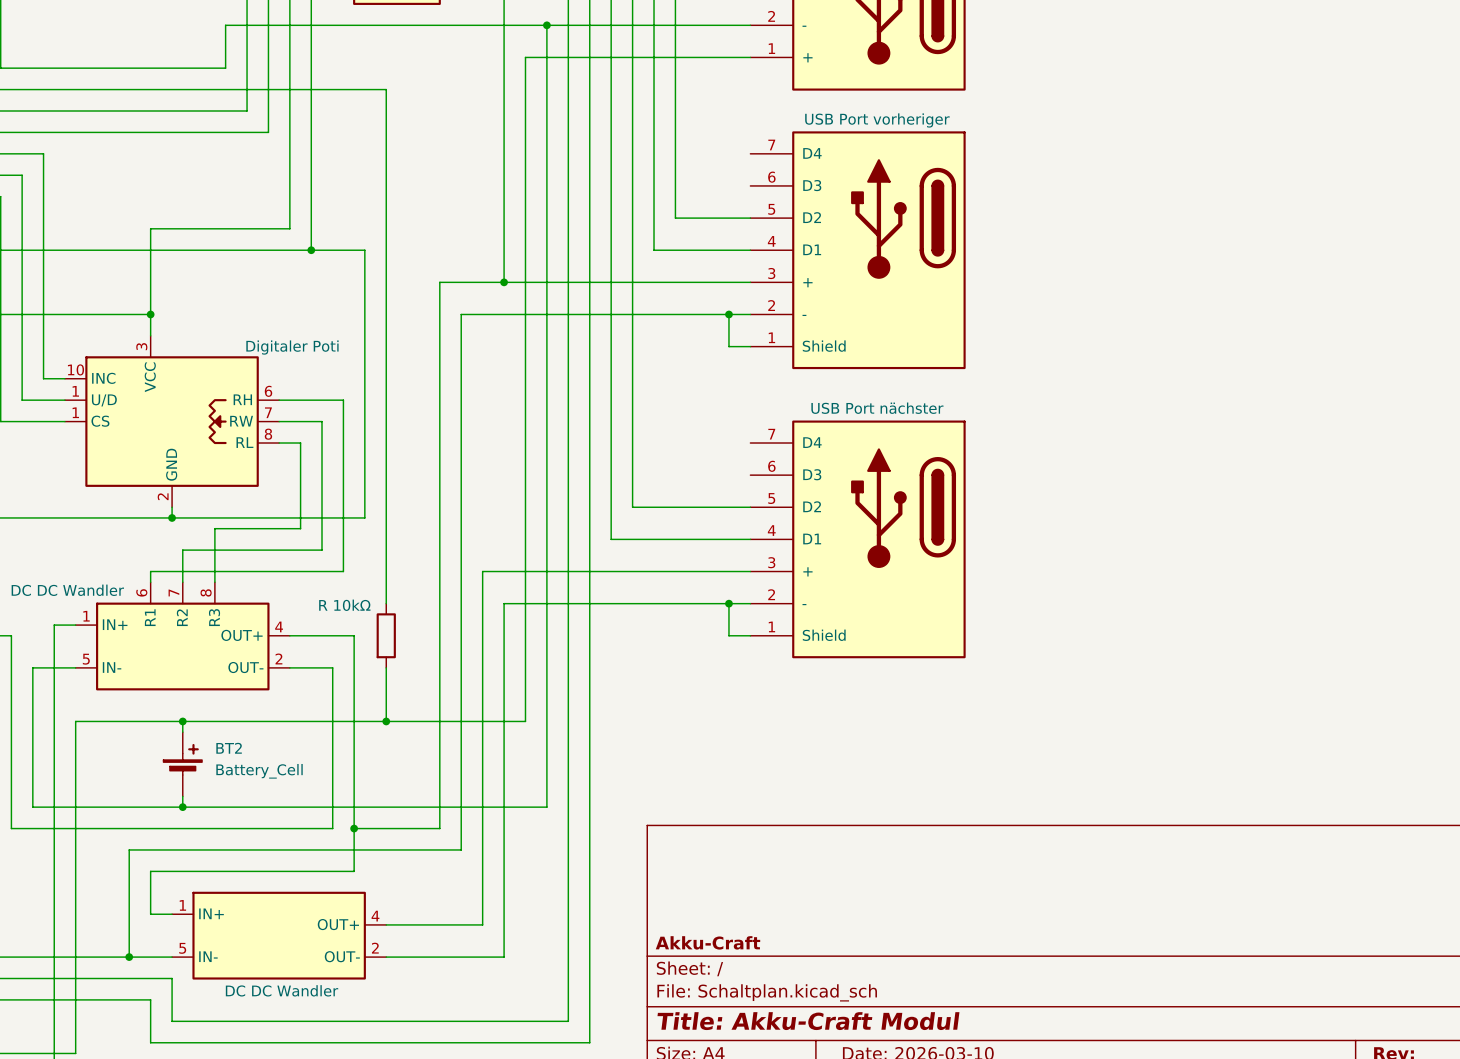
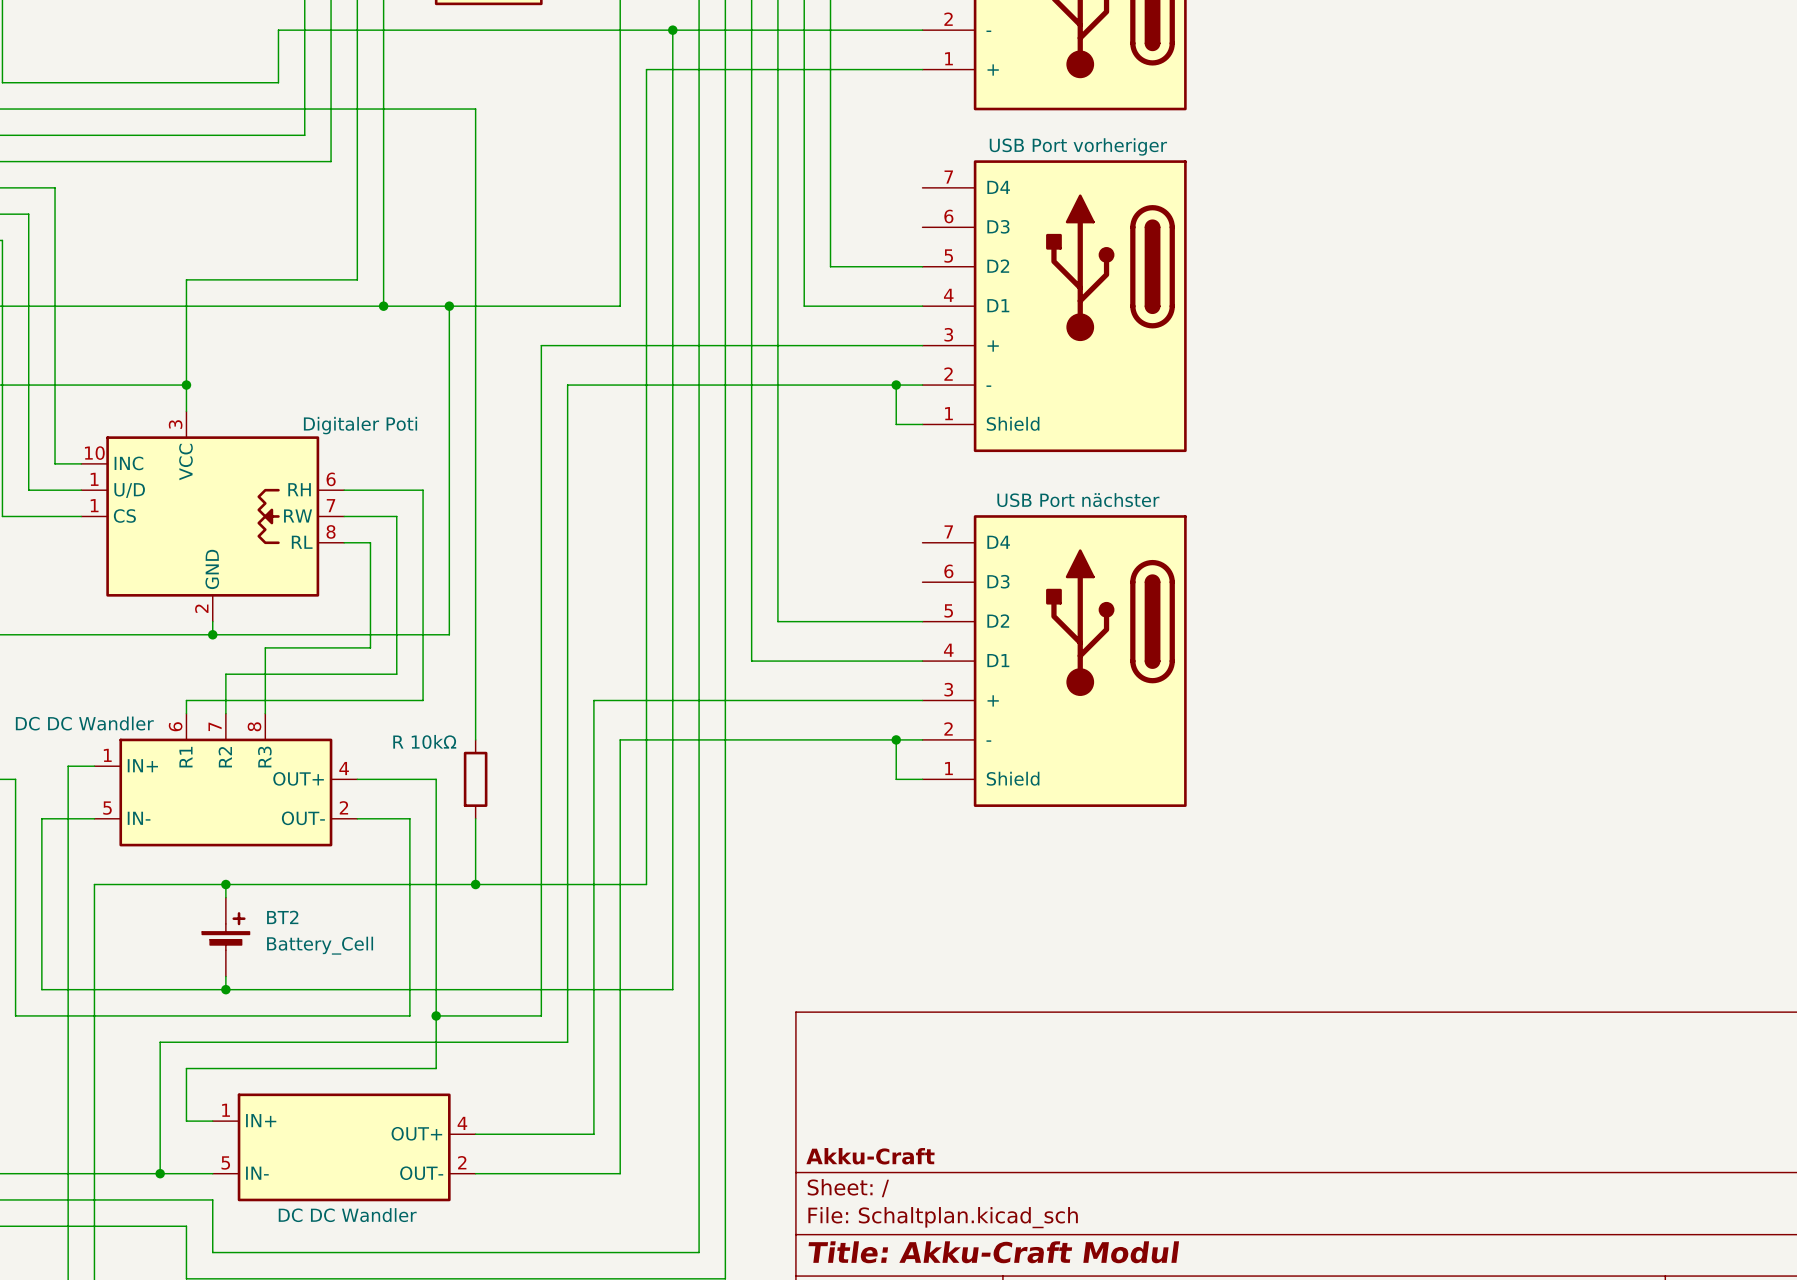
junction: none -> (449, 306)
wire: (504, 250) (504, 282) -> (620, 306) (449, 306)
junction: (504, 282) -> none

